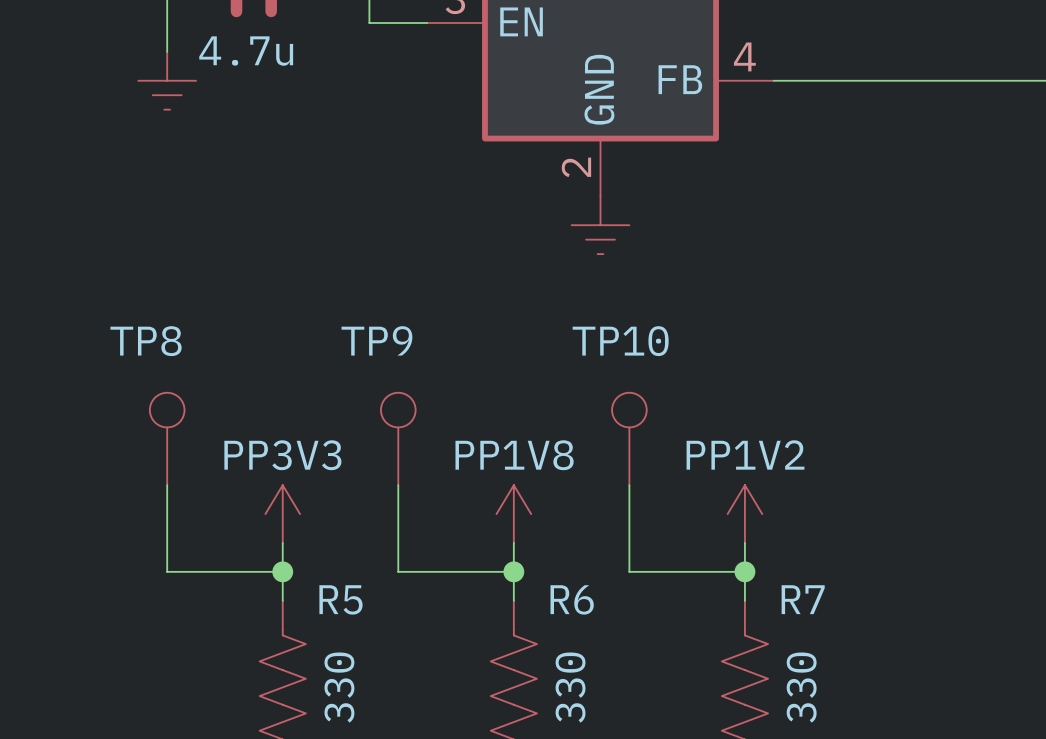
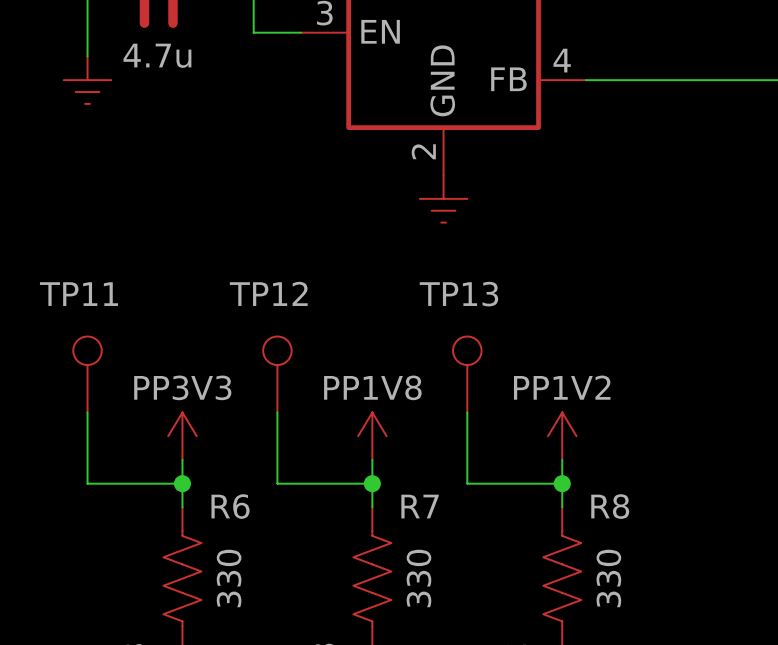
TP9 name: TP9 (376, 340) -> TP12 (268, 293)
TP8 name: TP8 (146, 341) -> TP11 (78, 294)
TP10 name: TP10 (620, 341) -> TP13 (458, 294)
R5 name: R5 (340, 599) -> R6 (230, 506)
R6 name: R6 (572, 599) -> R7 (420, 506)
R7 name: R7 (803, 599) -> R8 (610, 506)

